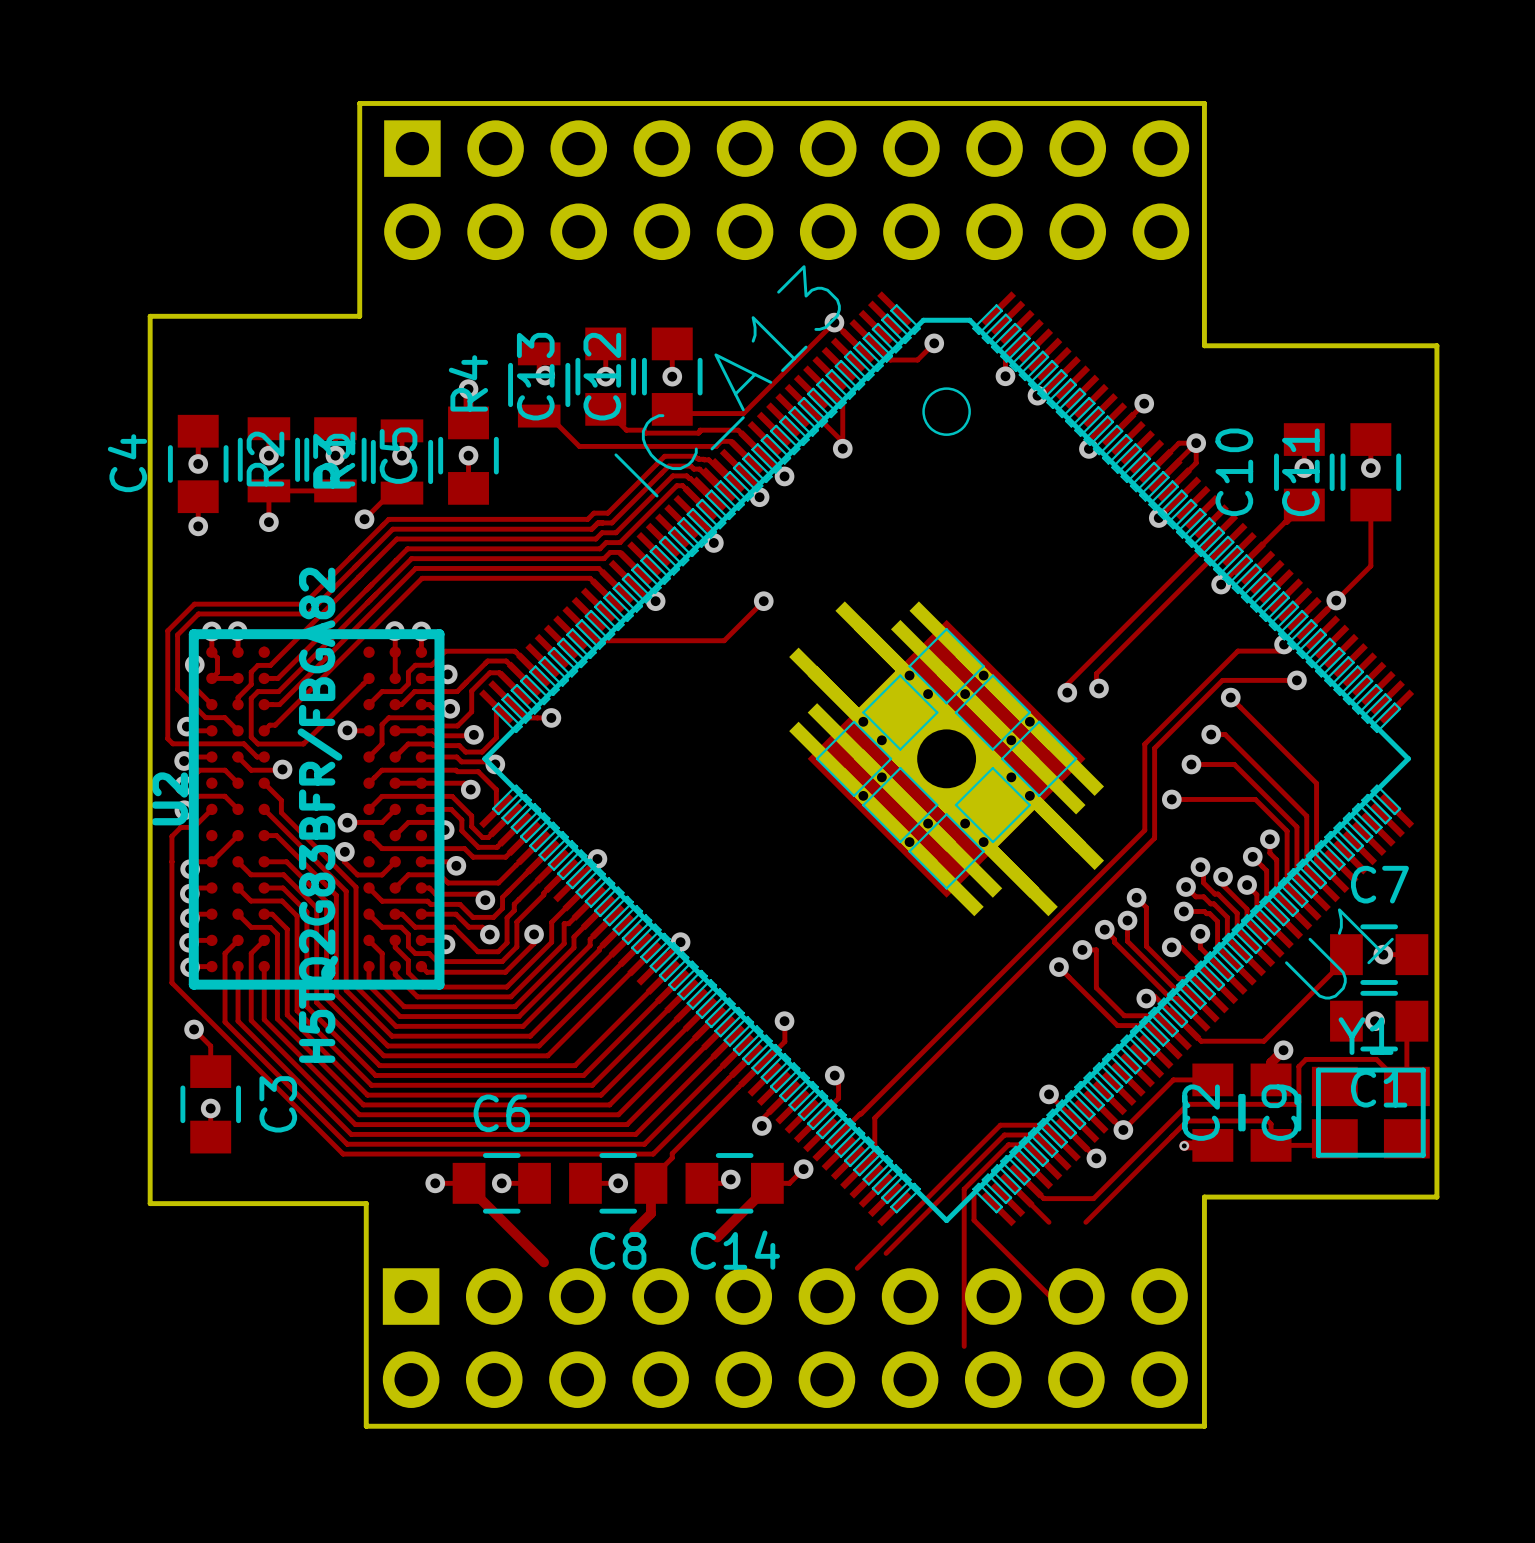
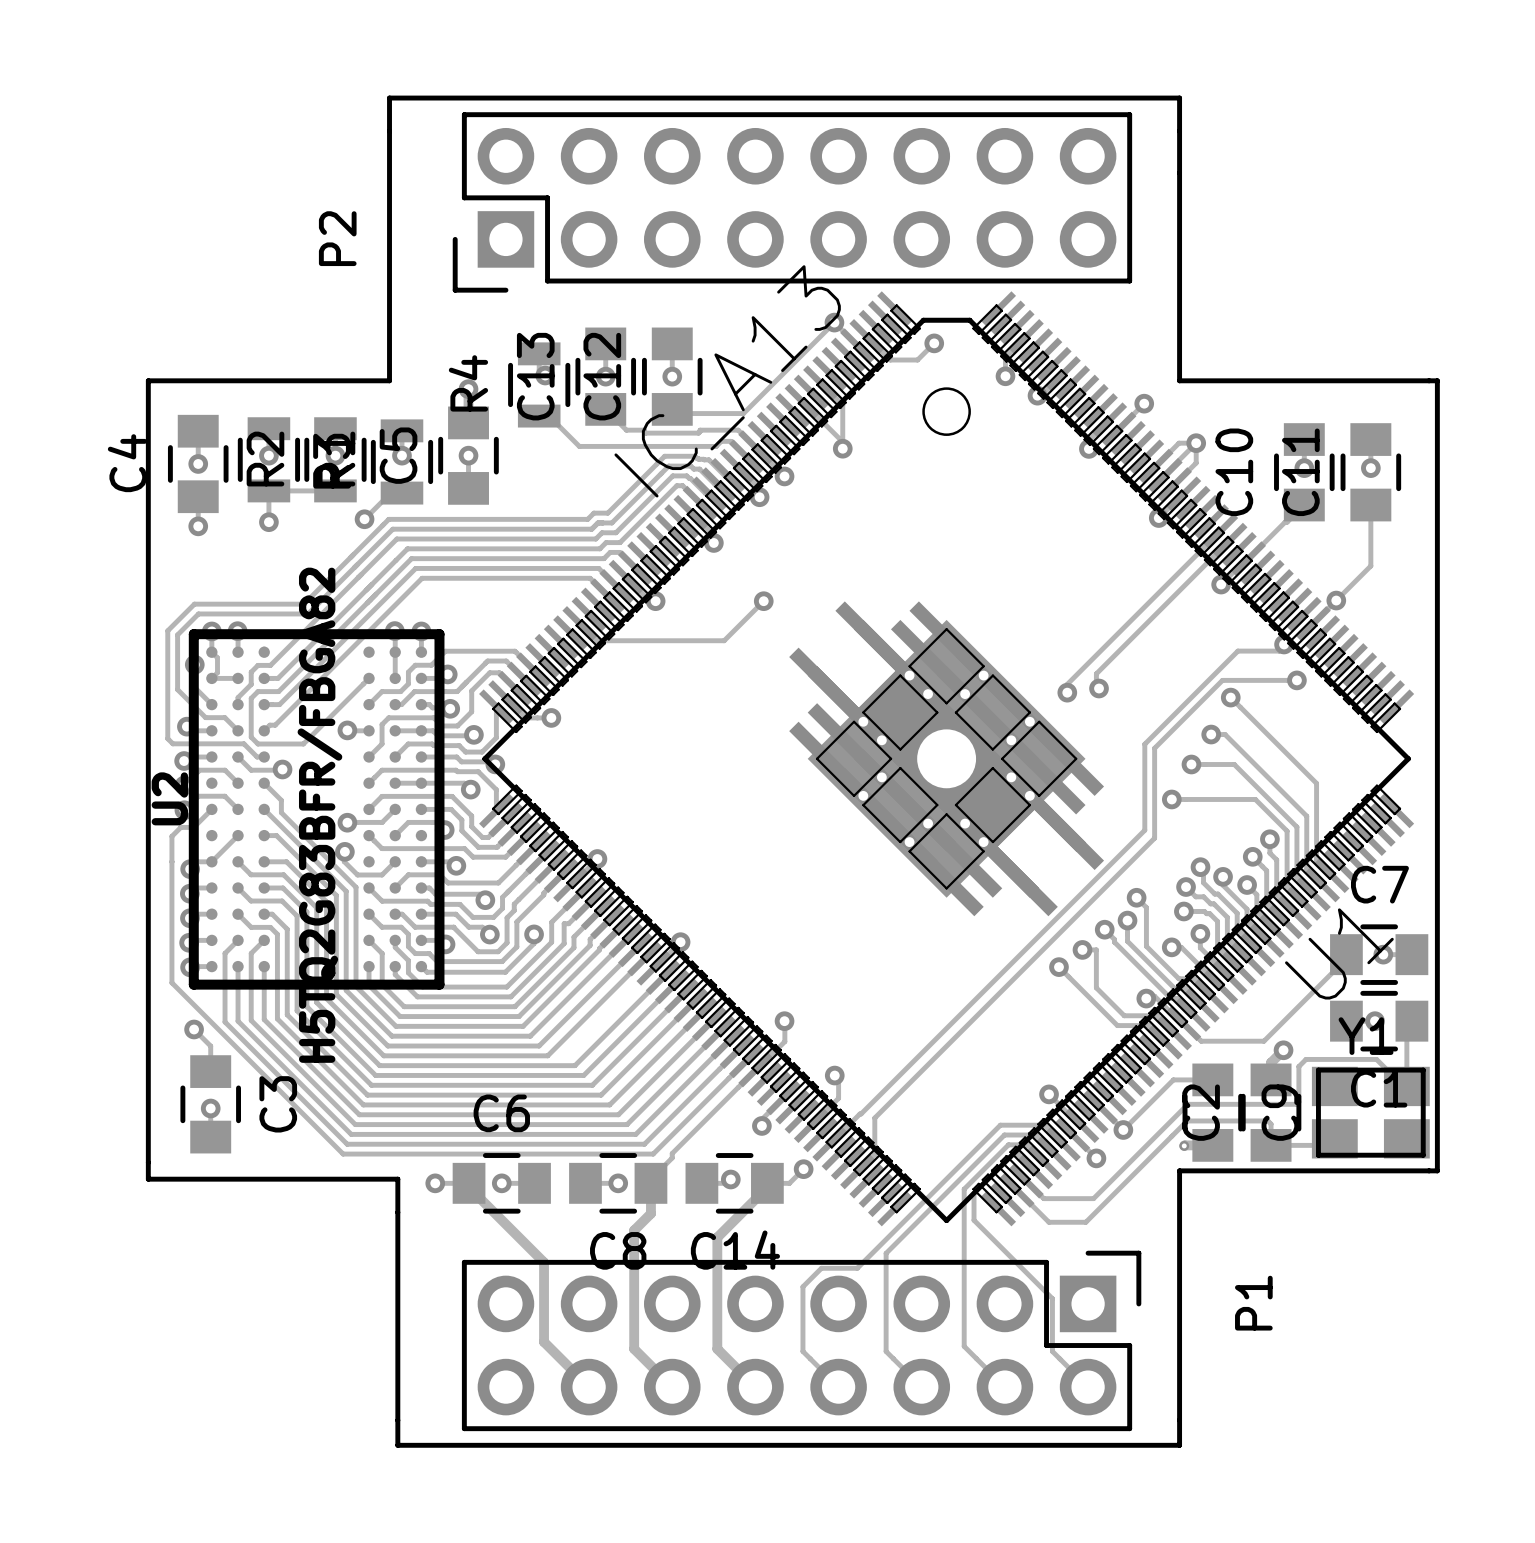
board edge: (359, 103) (1204, 103) (1204, 345) (1436, 345) (1436, 1197) (1204, 1197) (1204, 1426) (366, 1426) (366, 1203) (150, 1203) (150, 316) (359, 316) (359, 103) -> (389, 98) (389, 380) (148, 380) (148, 1179) (397, 1179) (397, 1445) (1179, 1445) (1179, 1170) (1437, 1170) (1437, 380) (1179, 380) (1179, 98) (389, 98)
part: (786, 190) -> none
P2: none -> (792, 202)
track: none -> (1048, 1222) (1085, 1222)
track: none -> (634, 1230) (634, 1348) (672, 1387)
track: none -> (717, 1237) (717, 1348) (755, 1387)
track: none -> (886, 1253) (886, 1351) (921, 1387)
track: none -> (544, 1262) (544, 1342) (589, 1387)
track: none -> (857, 1268) (821, 1268) (802, 1286) (802, 1351) (838, 1387)
track: none -> (1052, 1298) (1052, 1351) (1088, 1387)
part: (785, 1338) -> none
P1: none -> (801, 1340)
track: none -> (964, 1346) (1004, 1387)

